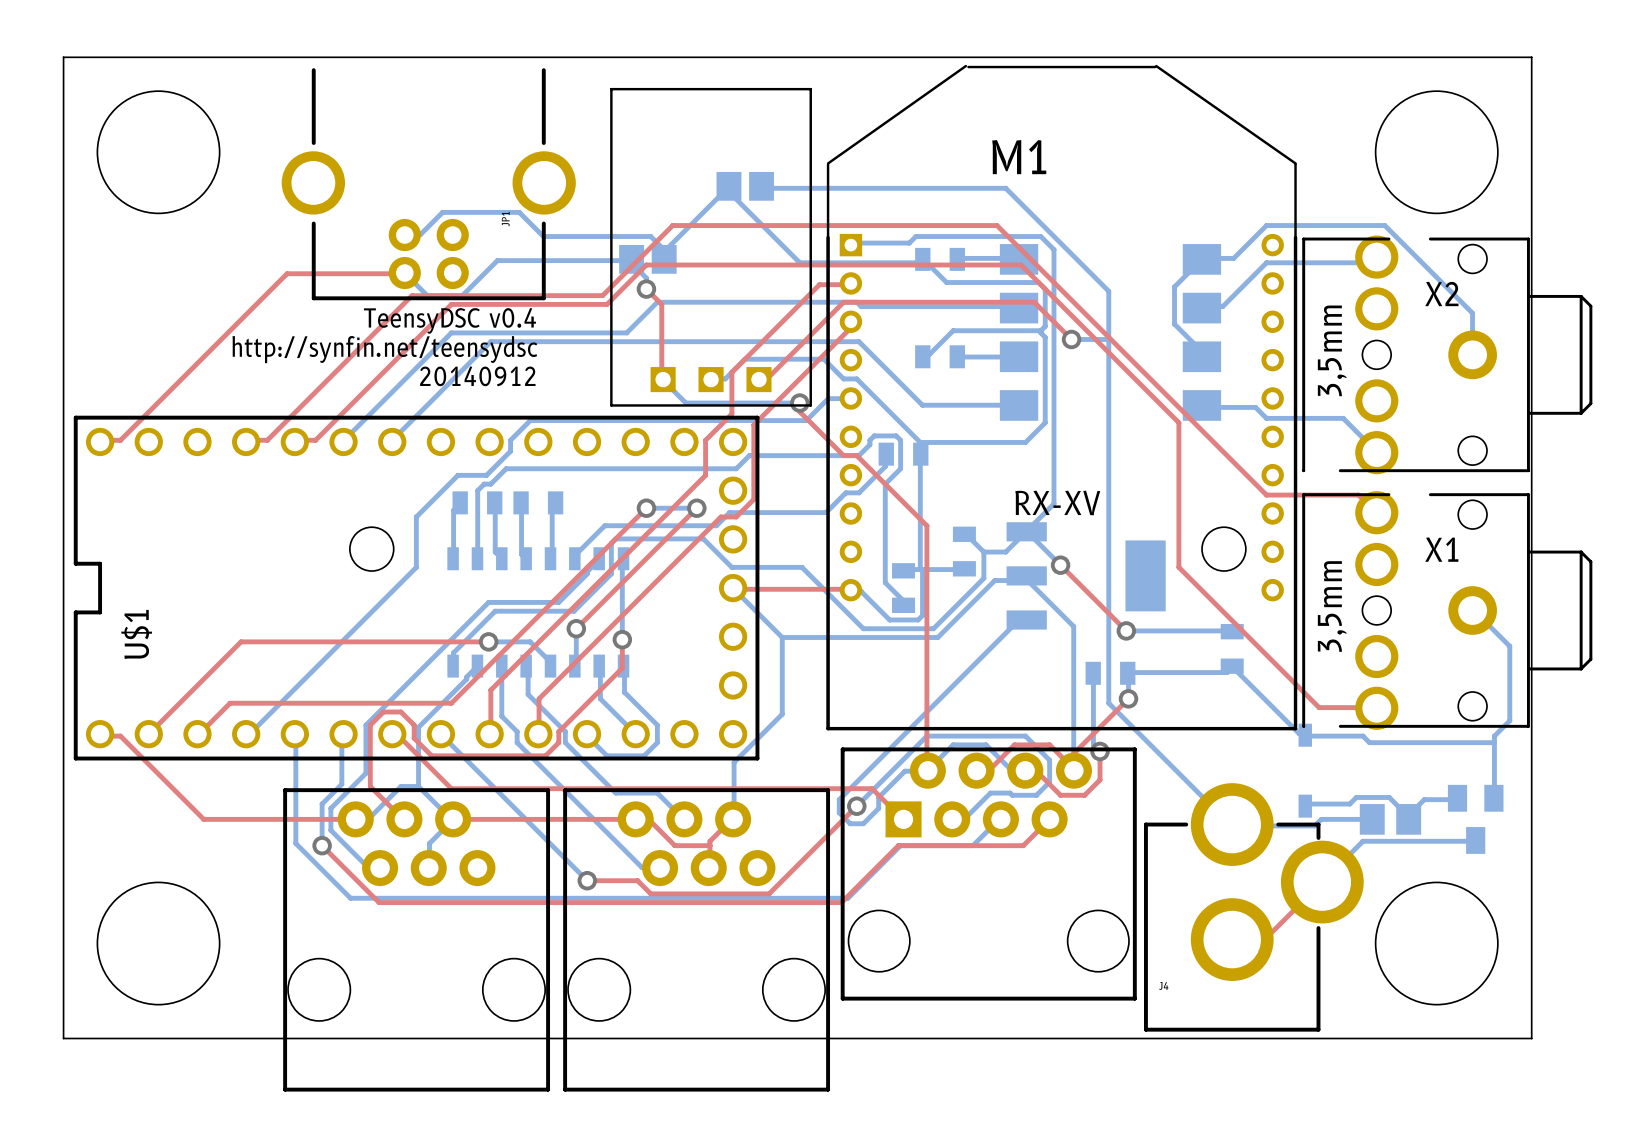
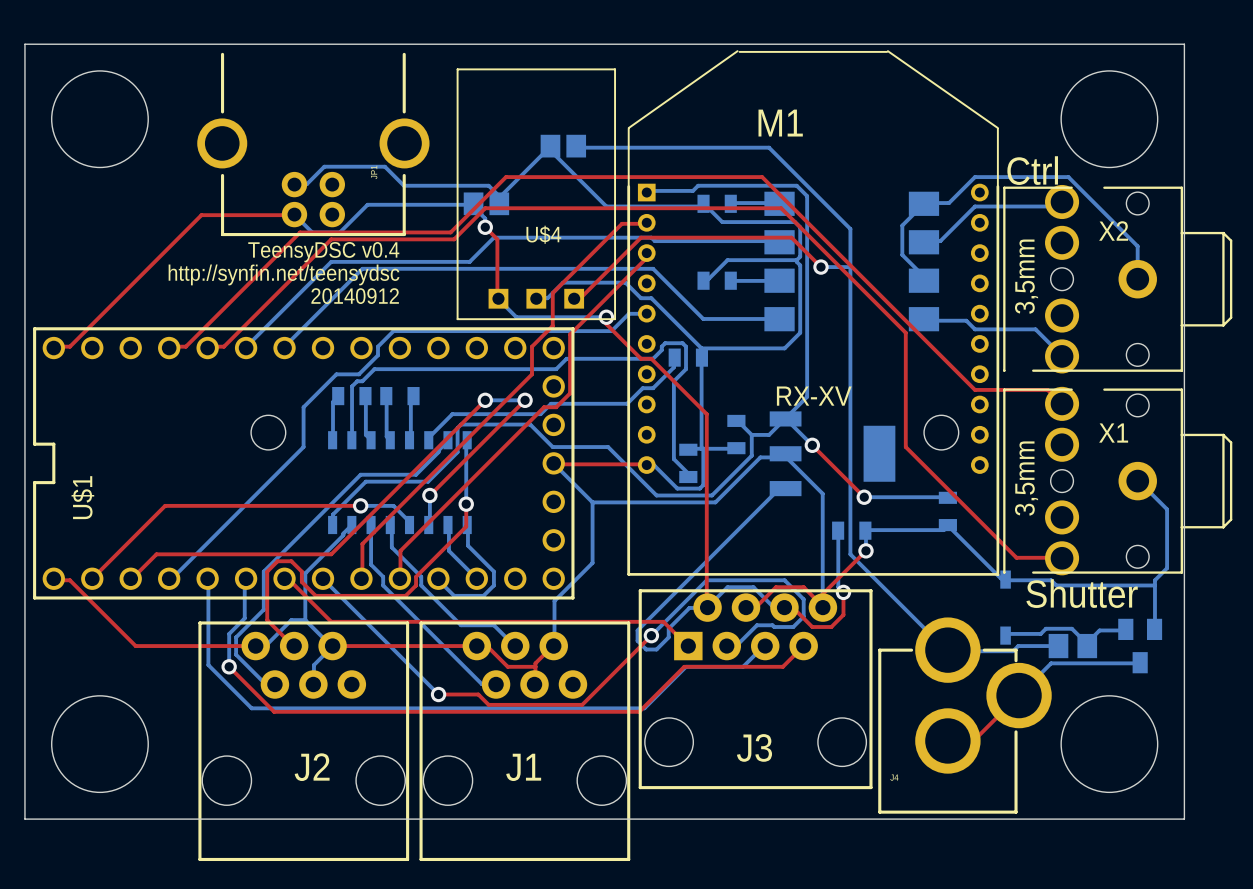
text: none -> Ctrl (1032, 170)
text: none -> U$4 (543, 234)
text: none -> Shutter (1082, 593)
text: none -> J3 (754, 747)
text: none -> J2 (312, 767)
text: none -> J1 (523, 767)

